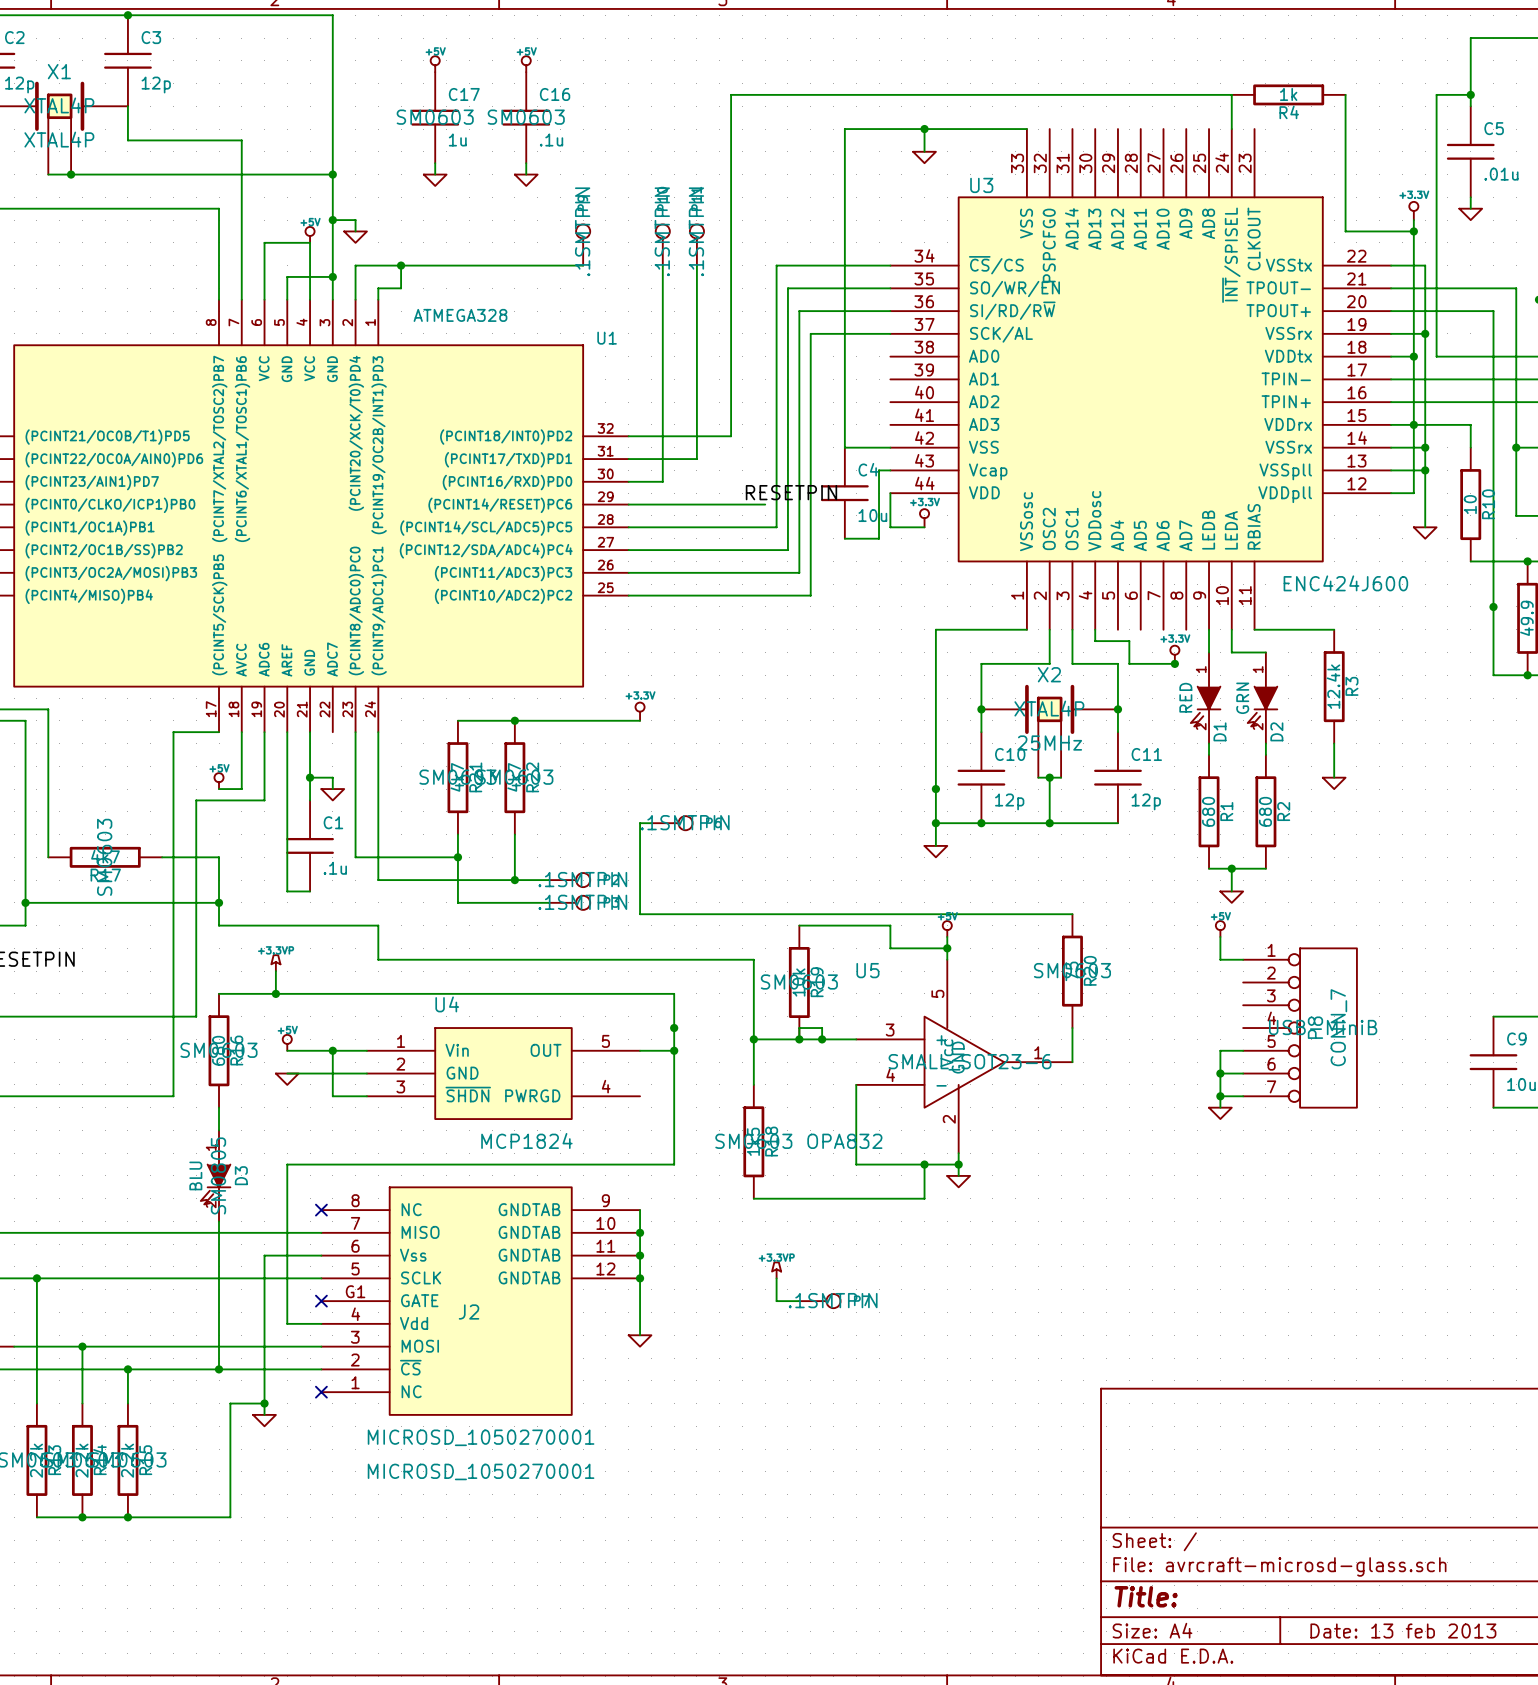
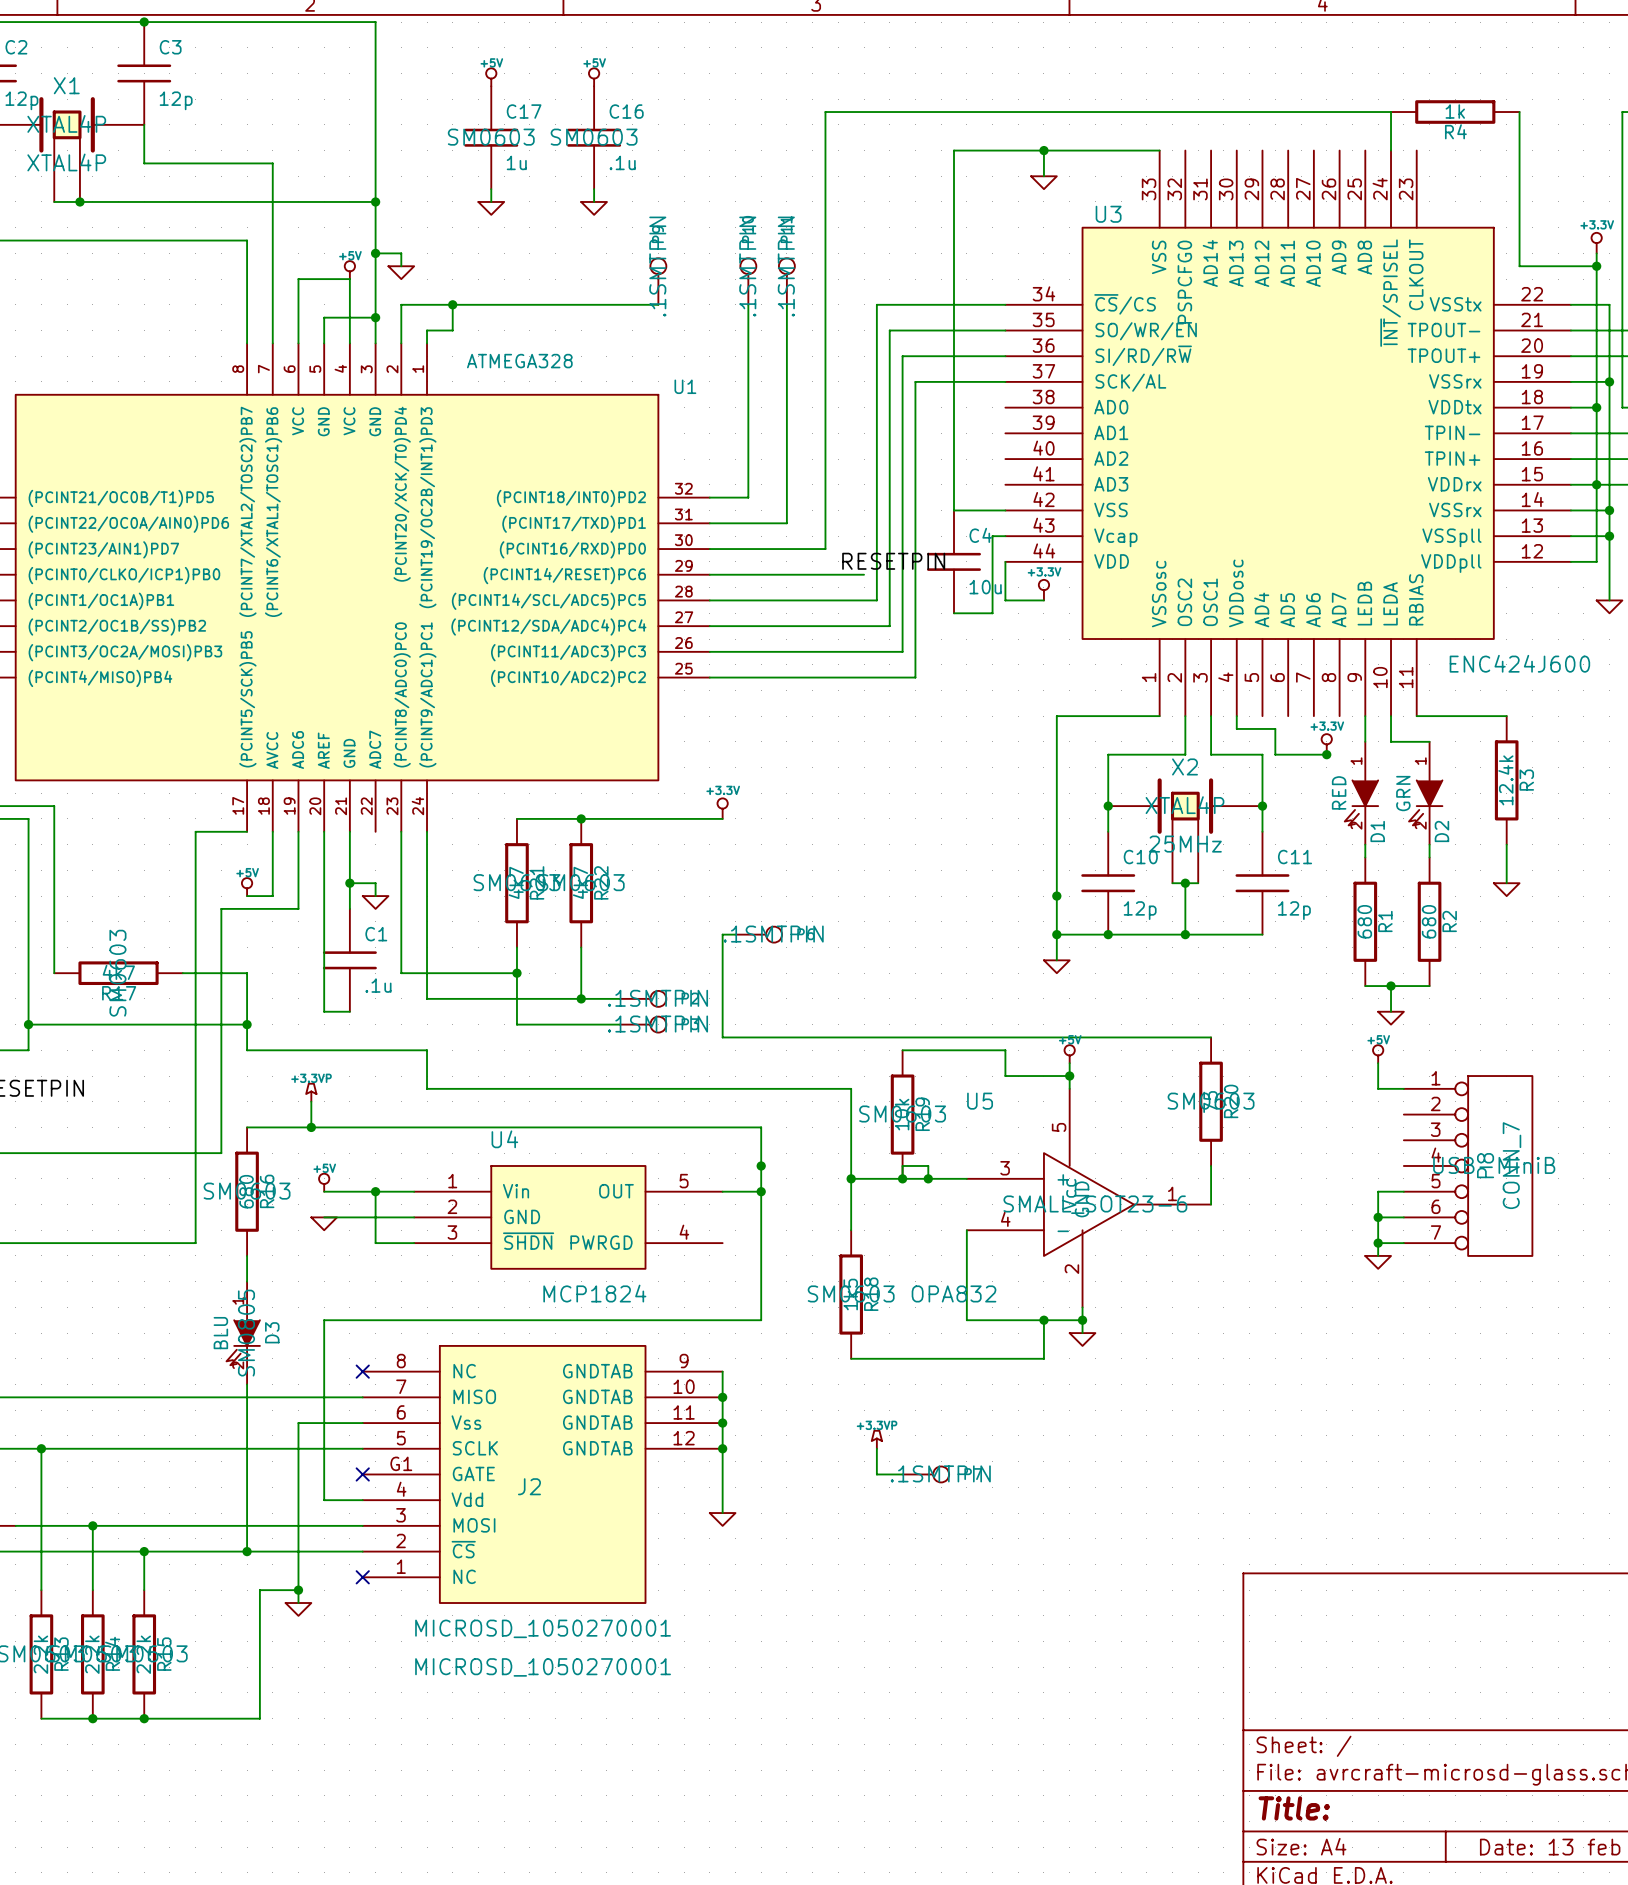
wire: (731, 436) (662, 436) (662, 481) -> (825, 497) (825, 549) (748, 549)

